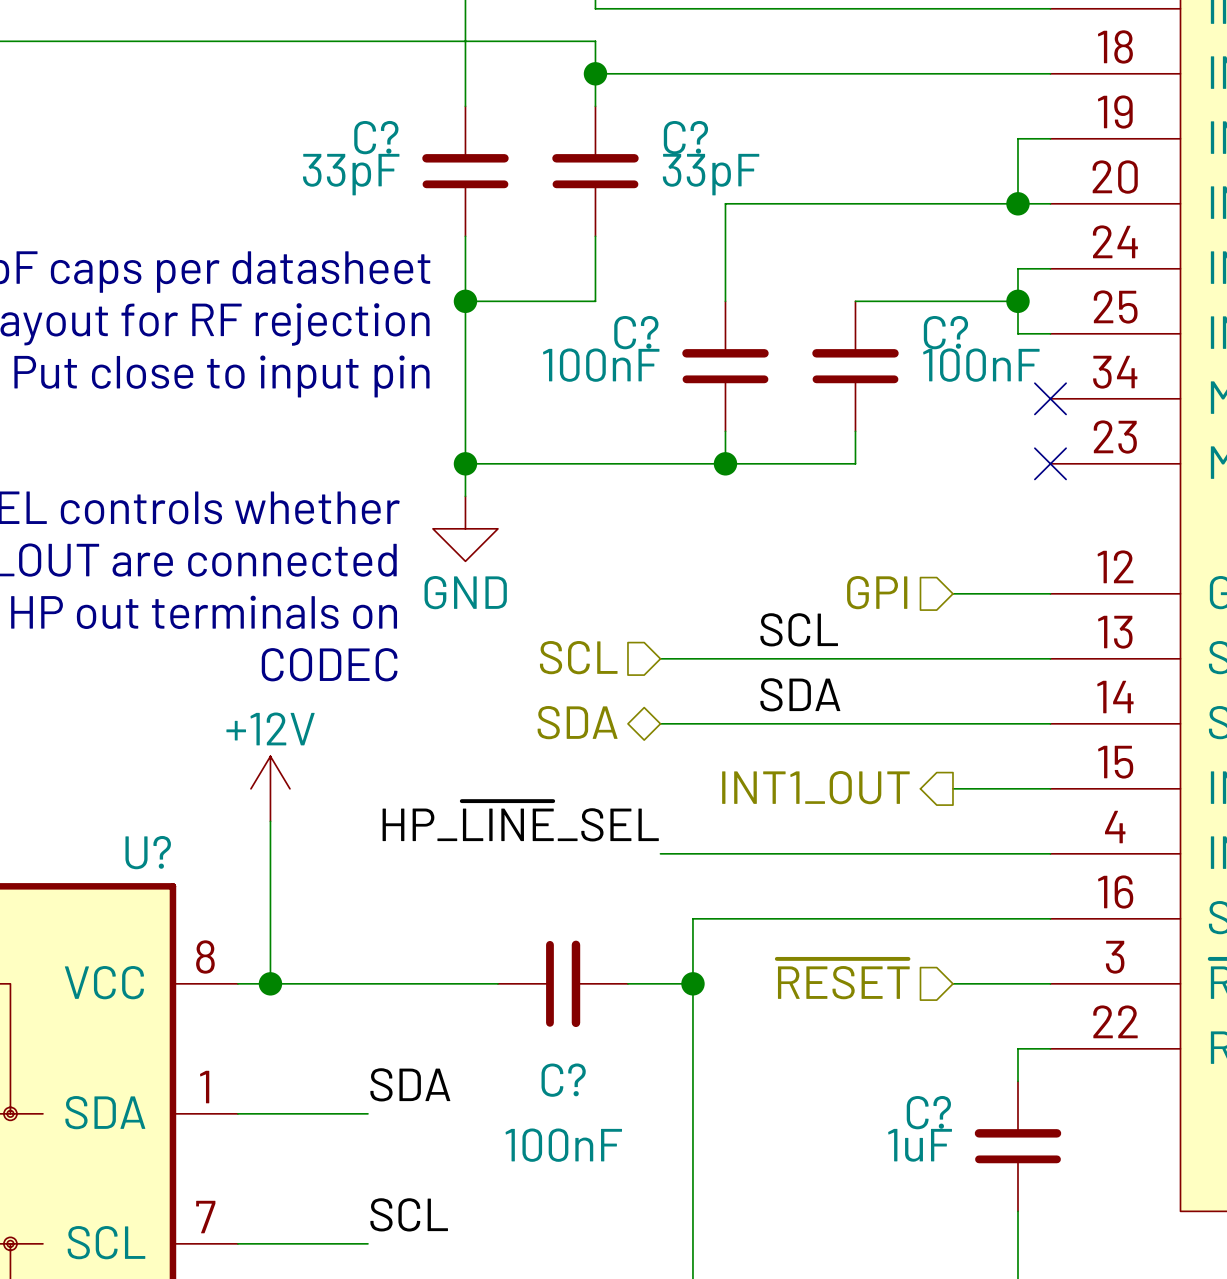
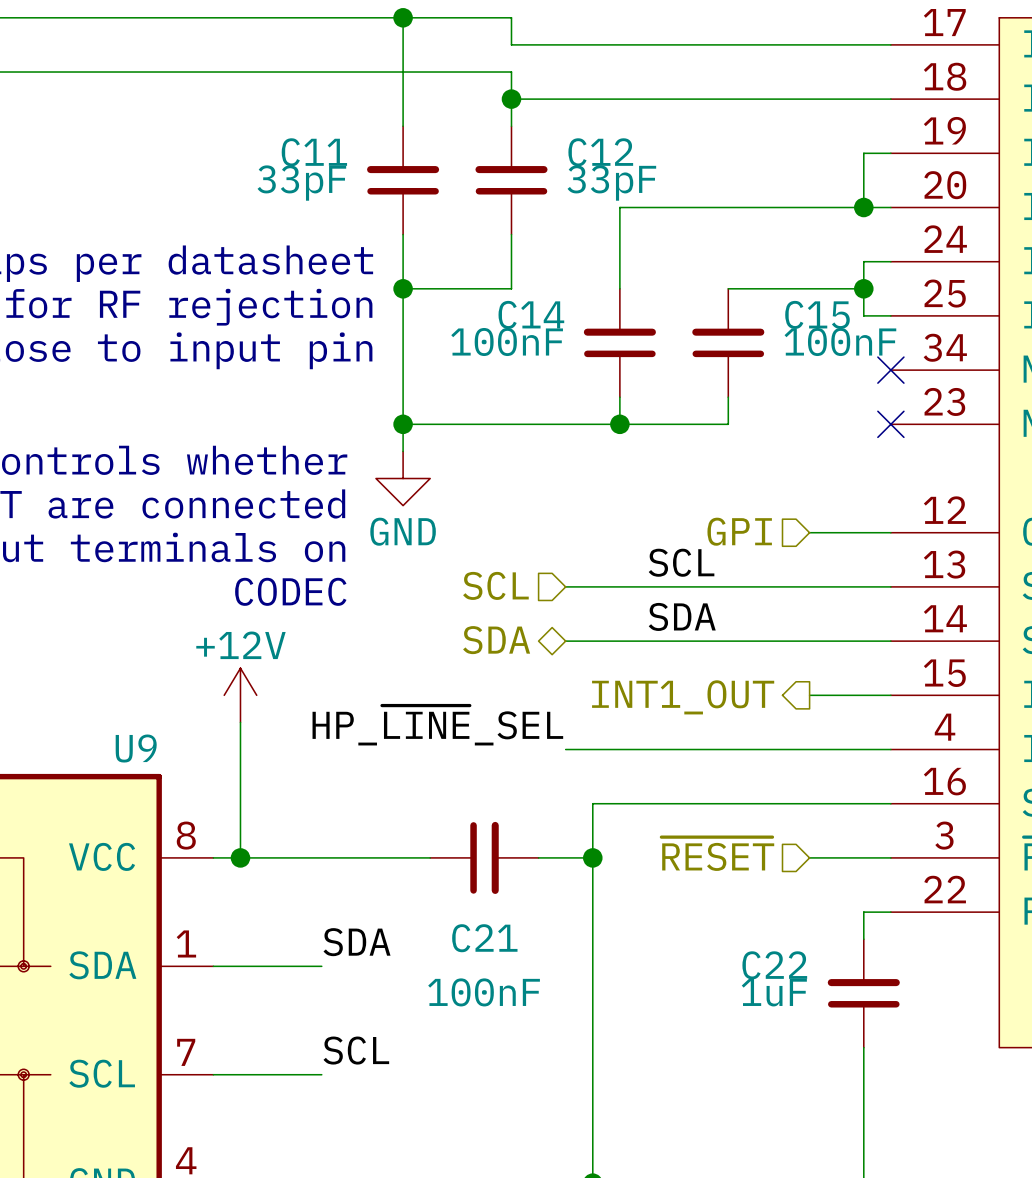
C? name: C? (376, 137) -> C11 (314, 152)
C? name: C? (685, 137) -> C12 (600, 152)
C? name: C? (636, 332) -> C14 (531, 314)
C? name: C? (945, 332) -> C15 (817, 314)
U? name: U? (148, 852) -> U9 (136, 748)
C? name: C? (563, 1080) -> C21 (484, 938)
C? name: C? (928, 1112) -> C22 (774, 965)

